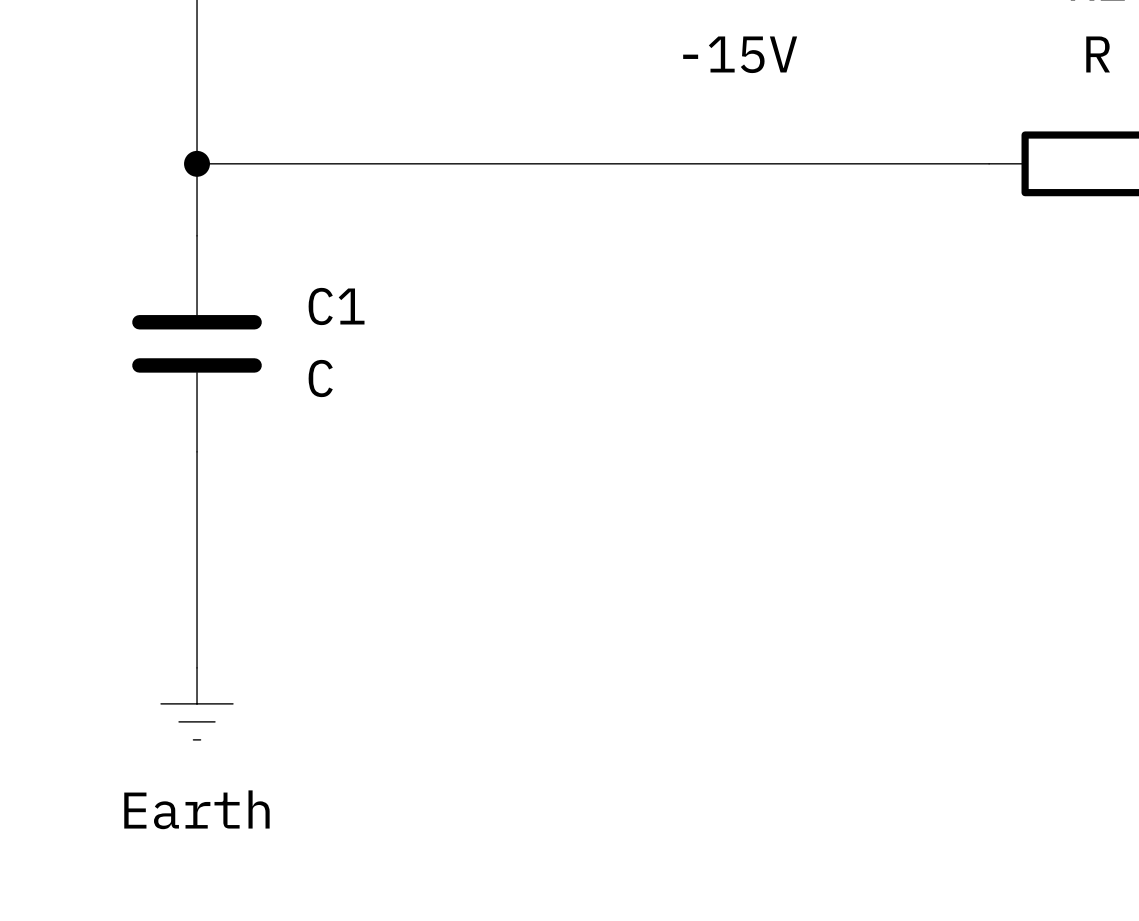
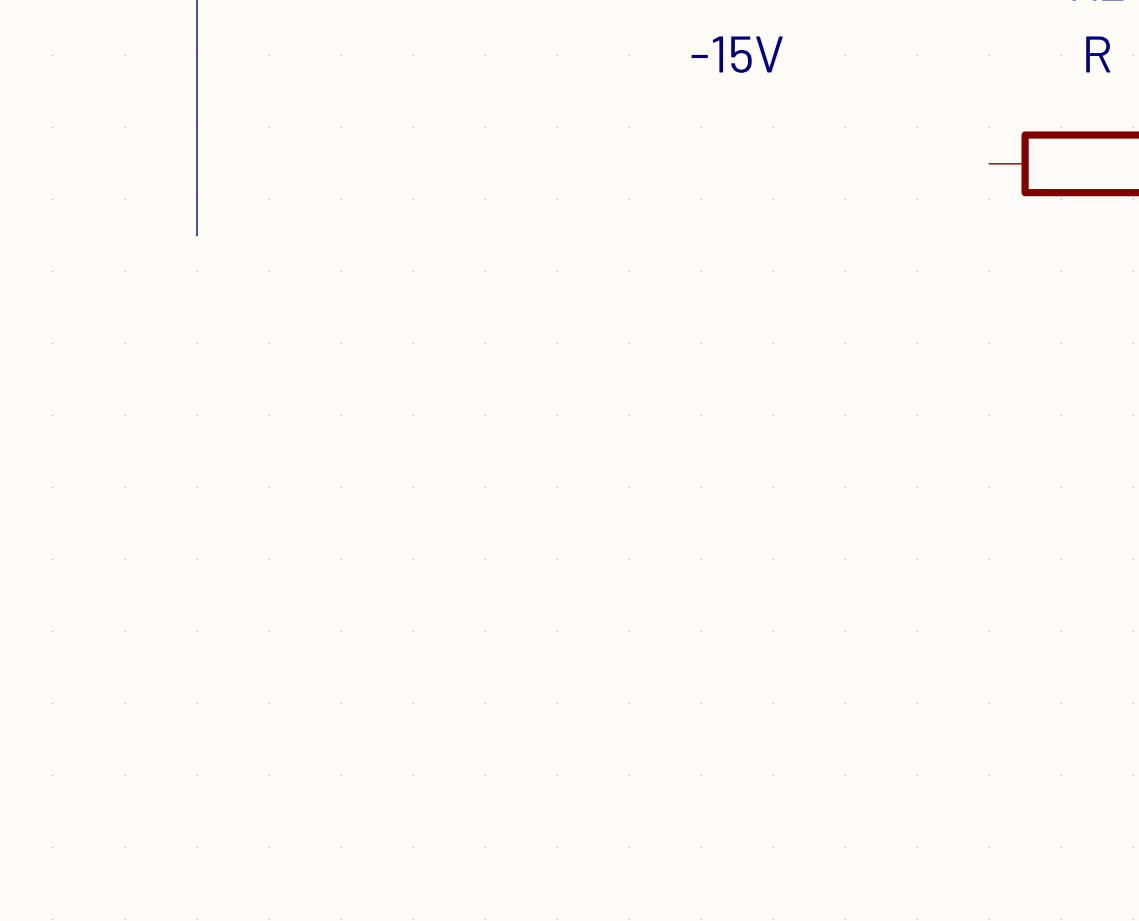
wire: (197, 163) (989, 163) -> none
junction: (197, 163) -> none
C1: C (197, 343) -> none
wire: (197, 451) (197, 667) -> none
power symbol: Earth (197, 703) -> none

